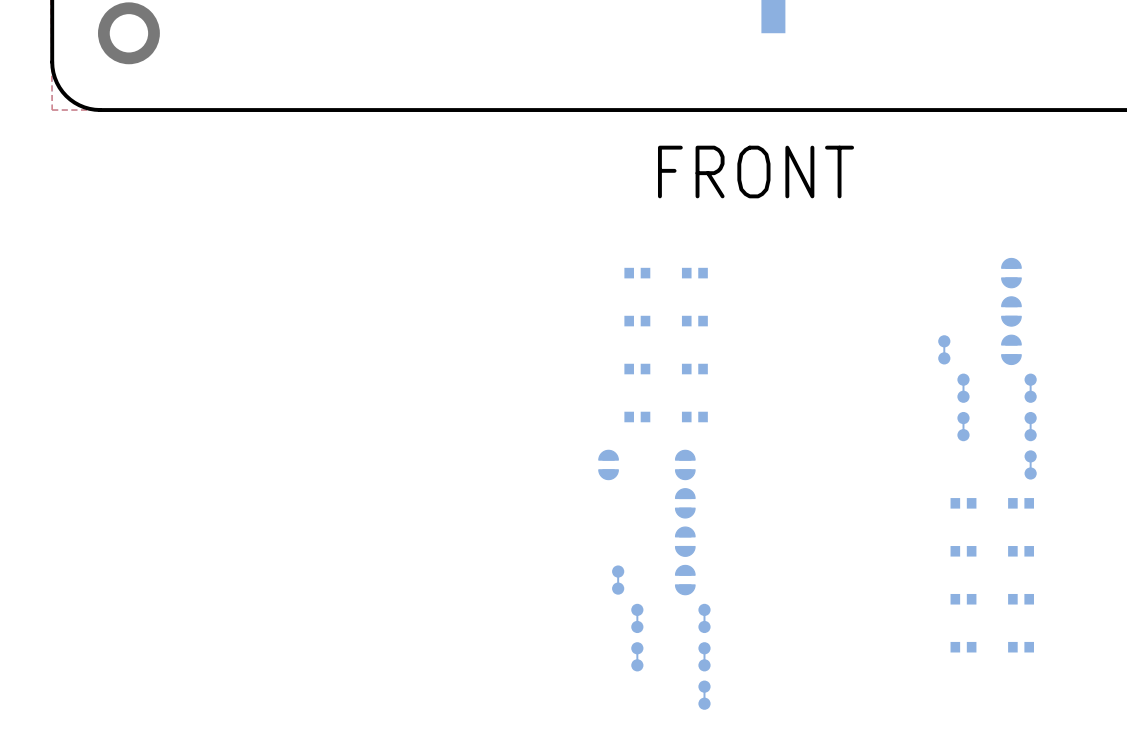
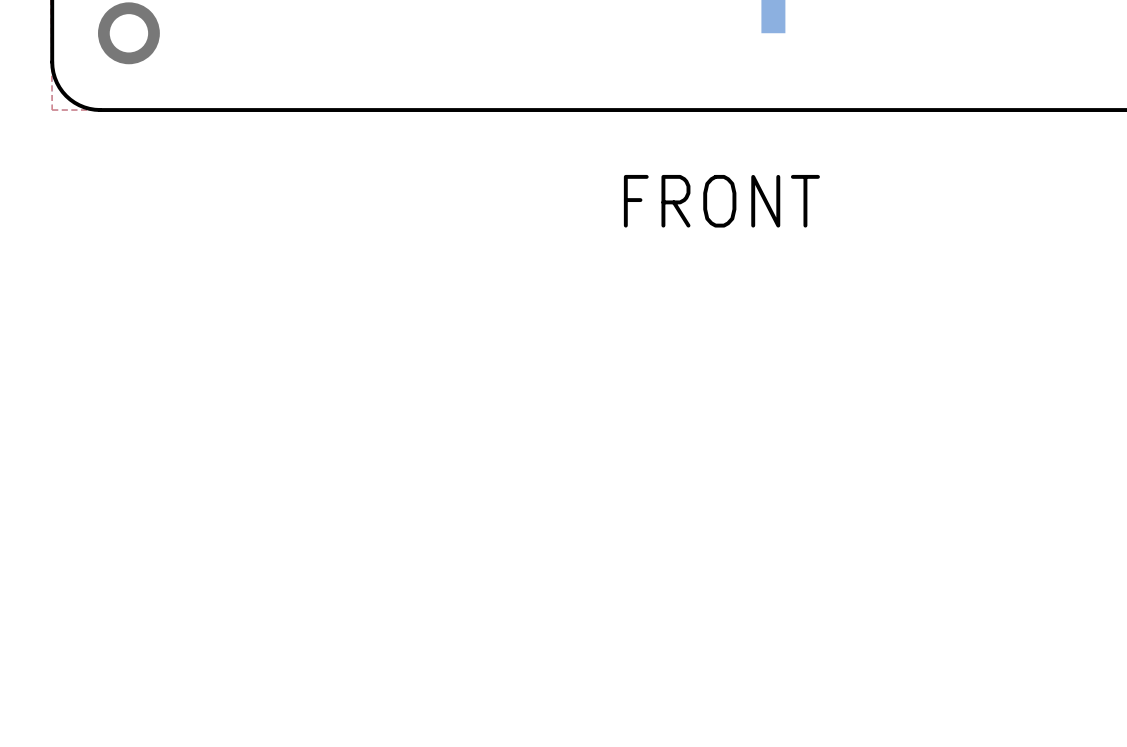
text position: FRONT (756, 172) -> FRONT (721, 201)
part: (637, 273) -> none
part: (694, 273) -> none
part: (1011, 273) -> none
part: (1011, 311) -> none
part: (637, 321) -> none
part: (694, 321) -> none
part: (944, 349) -> none
part: (1011, 349) -> none
part: (637, 369) -> none
part: (694, 369) -> none
part: (963, 388) -> none
part: (1030, 388) -> none
part: (637, 416) -> none
part: (694, 416) -> none
part: (963, 426) -> none
part: (1030, 426) -> none
part: (608, 464) -> none
part: (685, 464) -> none
part: (1030, 464) -> none
part: (685, 503) -> none
part: (963, 503) -> none
part: (1021, 503) -> none
part: (685, 541) -> none
part: (963, 551) -> none
part: (1021, 551) -> none
part: (618, 580) -> none
part: (685, 580) -> none
part: (963, 599) -> none
part: (1021, 599) -> none
part: (637, 618) -> none
part: (704, 618) -> none
part: (963, 647) -> none
part: (1021, 647) -> none
part: (637, 656) -> none
part: (704, 656) -> none
part: (704, 695) -> none

